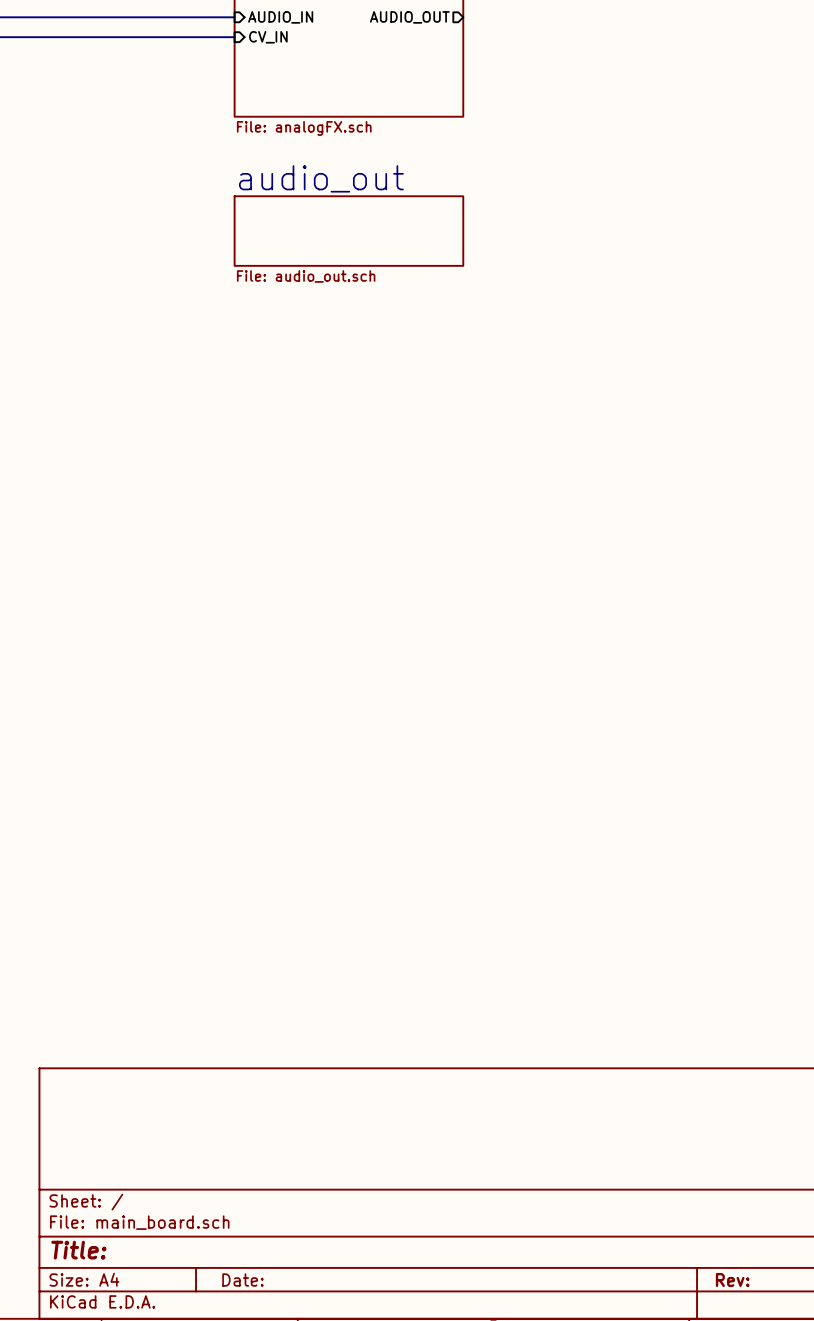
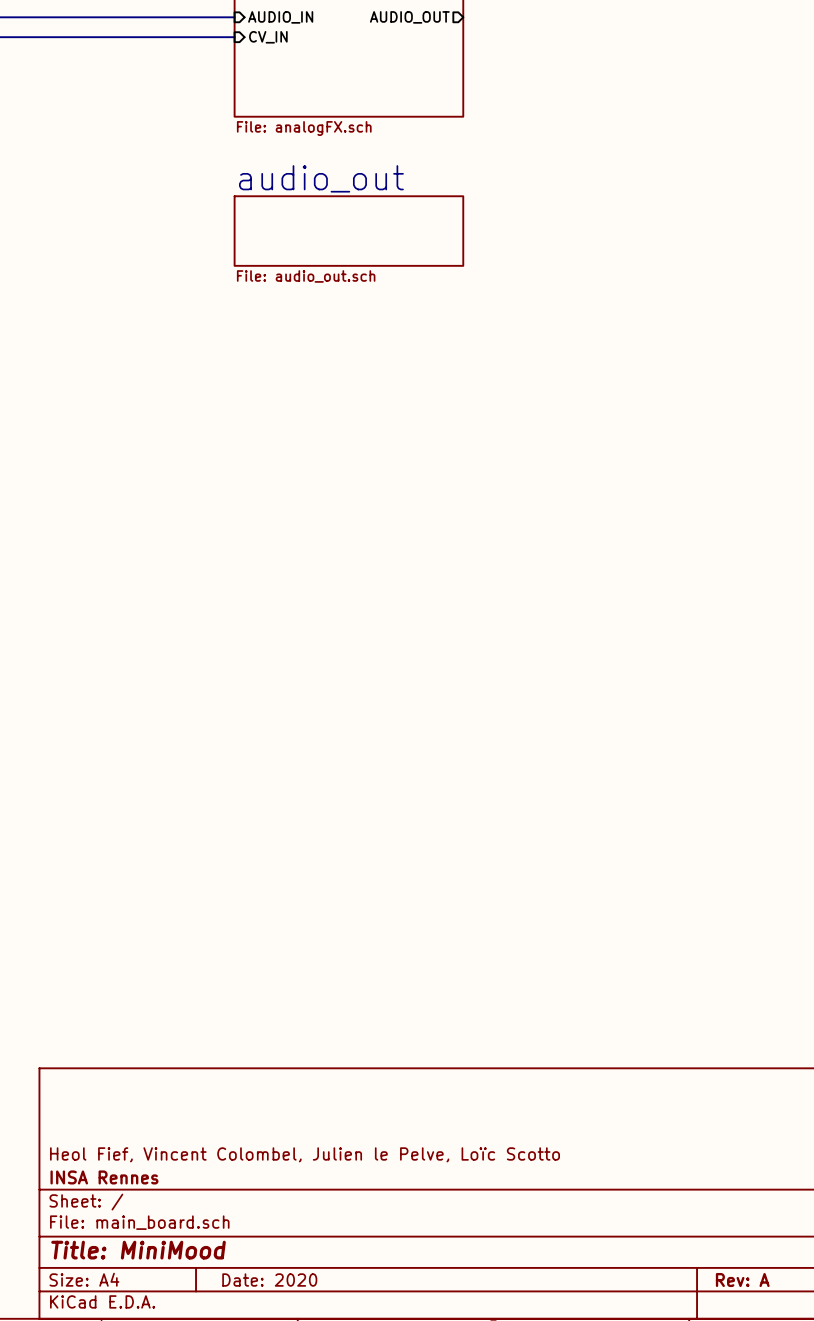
title block: none -> Heol Fief, Vincent Colombel, Julien le Pelve, Loïc Scotto (305, 1154)
title block: none -> INSA Rennes (104, 1177)
title block: Title: (78, 1250) -> Title: MiniMood (138, 1250)
title block: Date: (242, 1280) -> Date: 2020 (269, 1280)
title block: Rev: (732, 1280) -> Rev: A (742, 1280)

